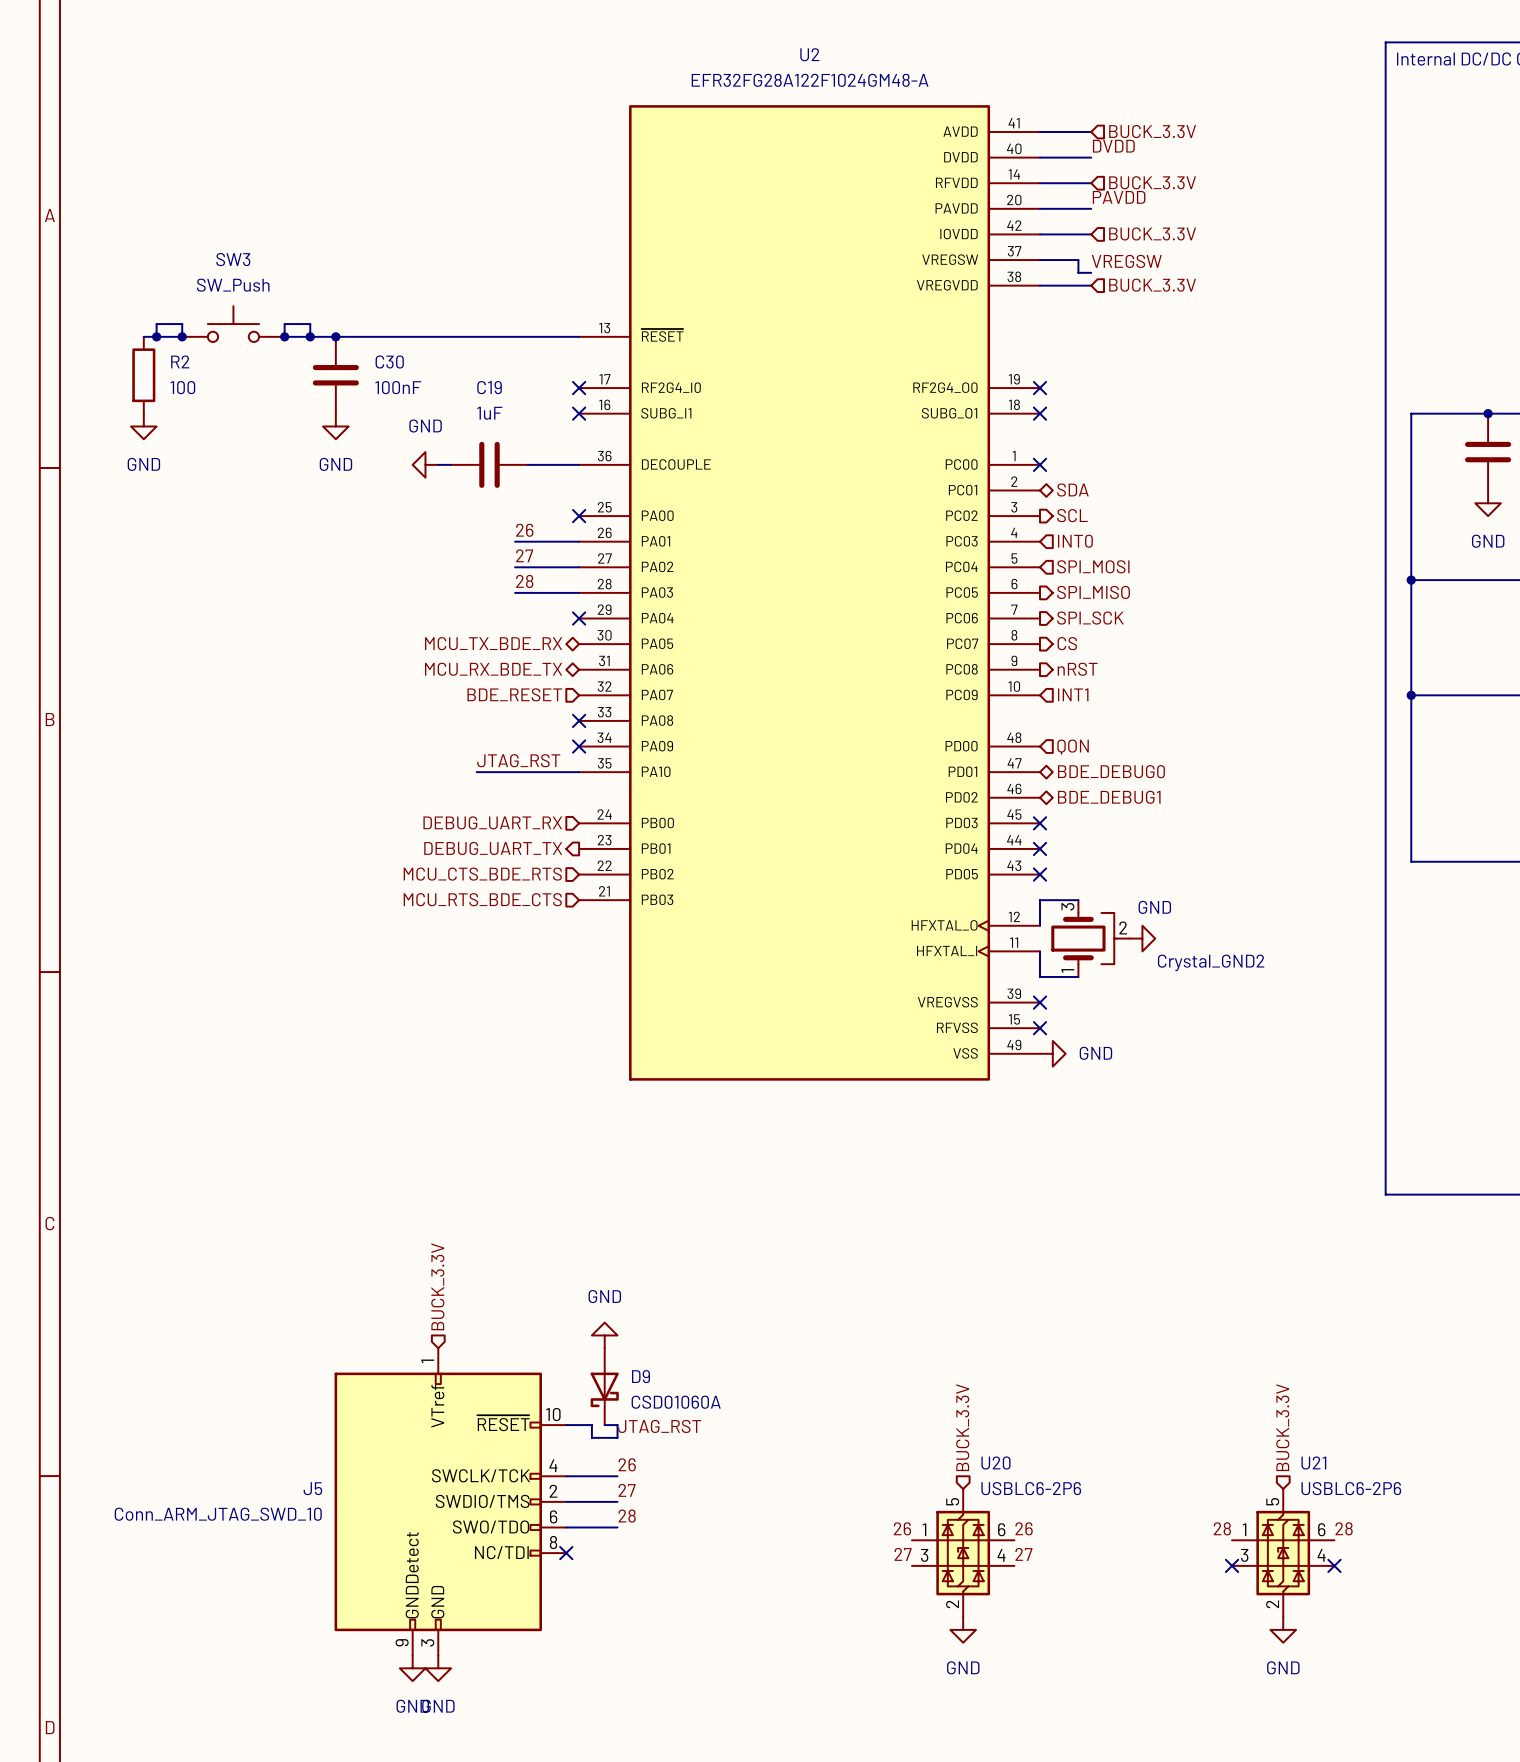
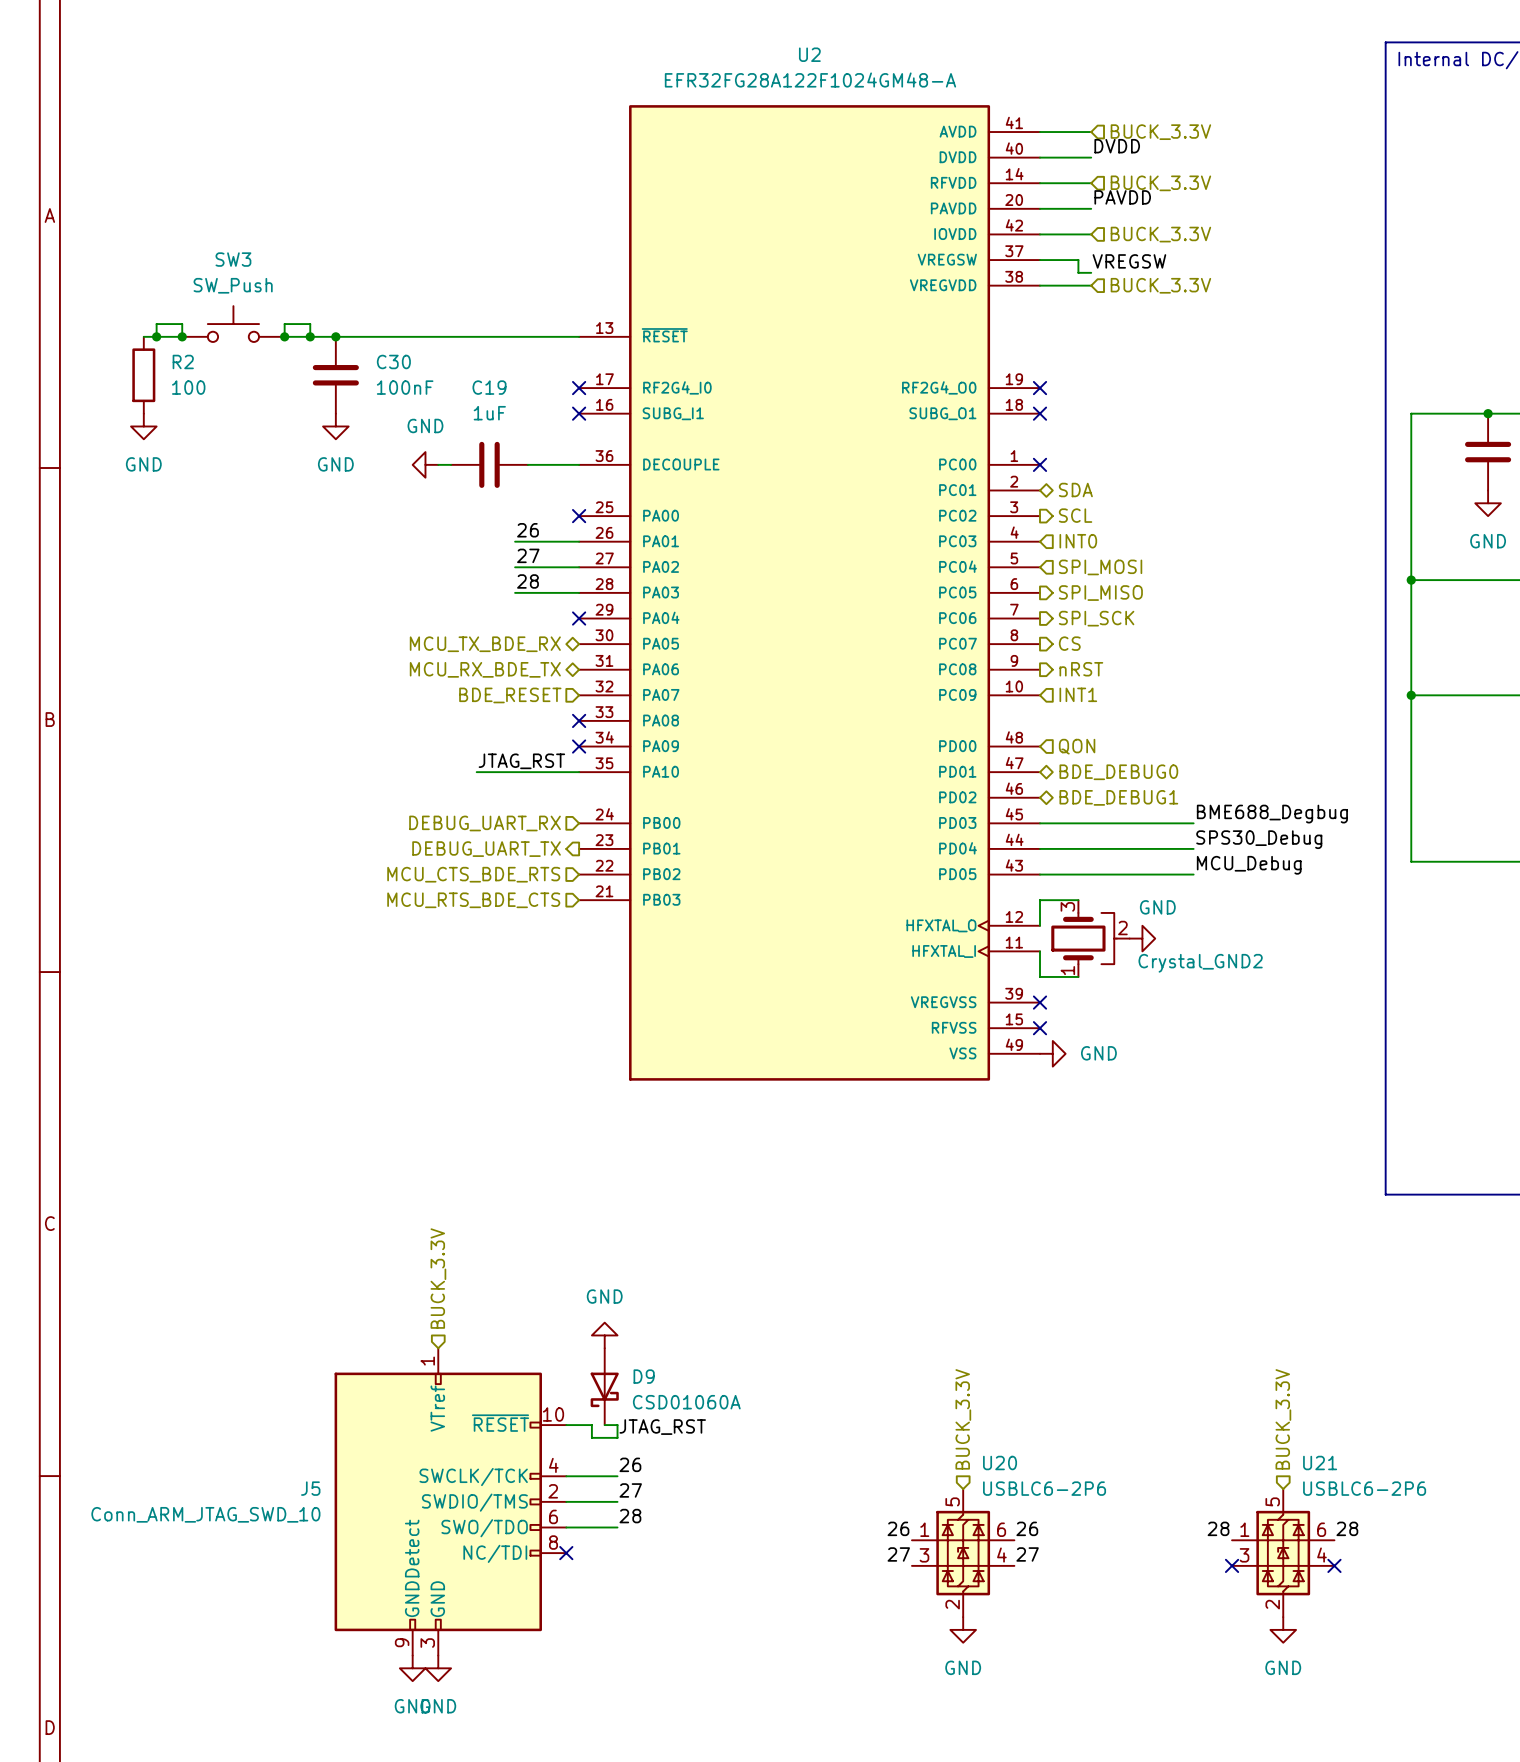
label: none -> BME688_Degbug (1272, 814)
wire: none -> (1040, 823) (1193, 823)
no-connect mark: (1040, 823) -> none
label: none -> SPS30_Debug (1259, 839)
wire: none -> (1040, 848) (1193, 848)
no-connect mark: (1040, 848) -> none
label: none -> MCU_Debug (1249, 865)
wire: none -> (1040, 874) (1193, 874)
no-connect mark: (1040, 874) -> none

